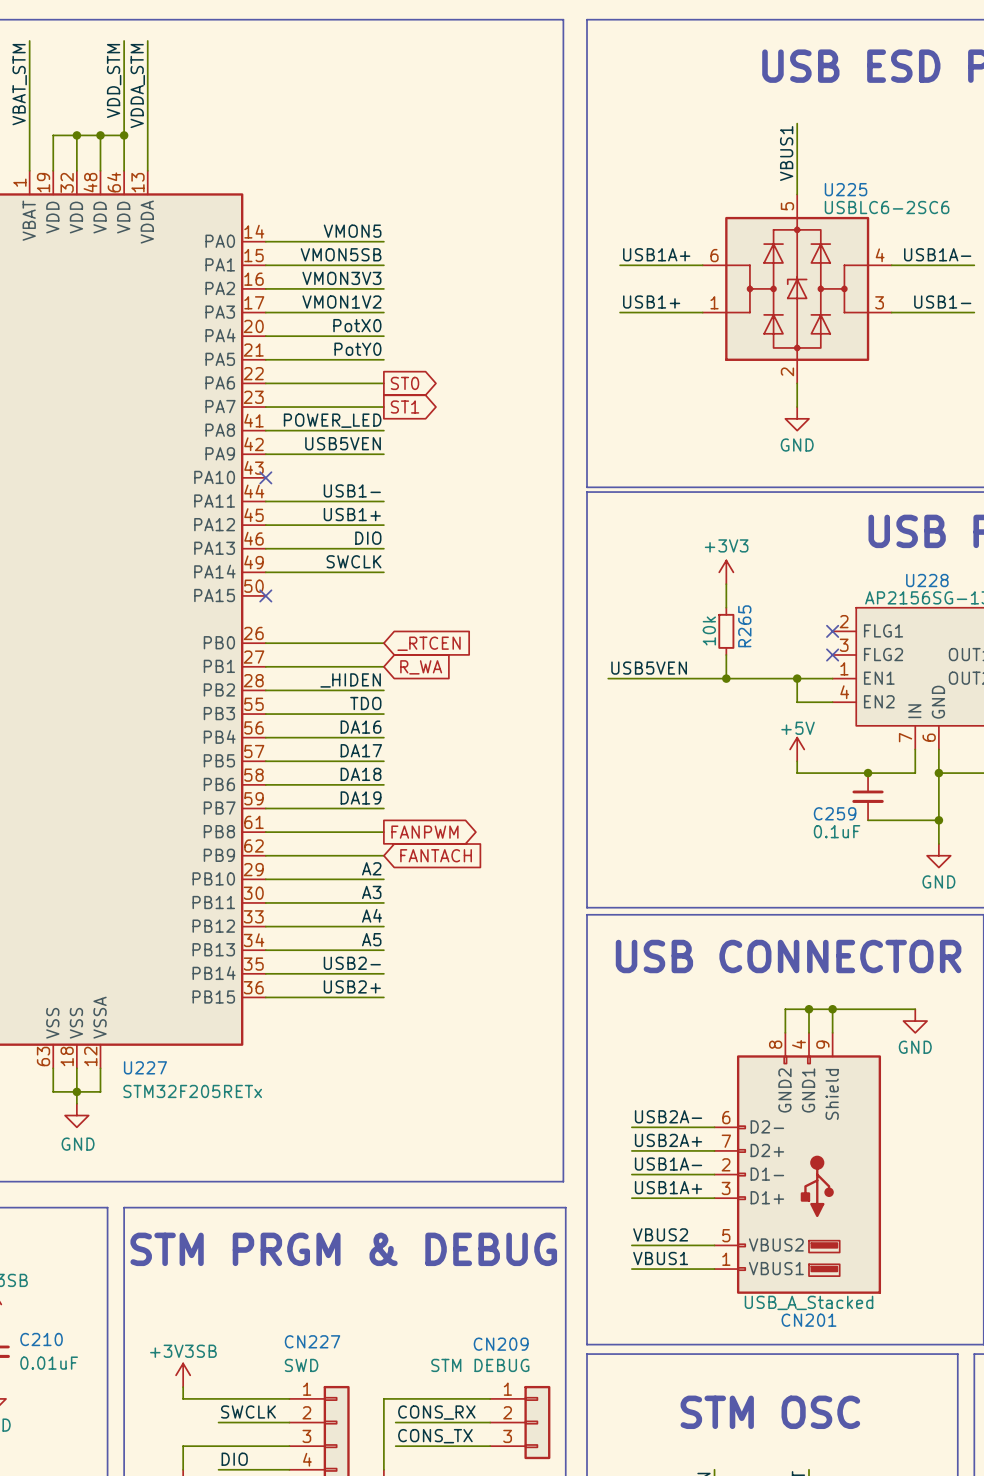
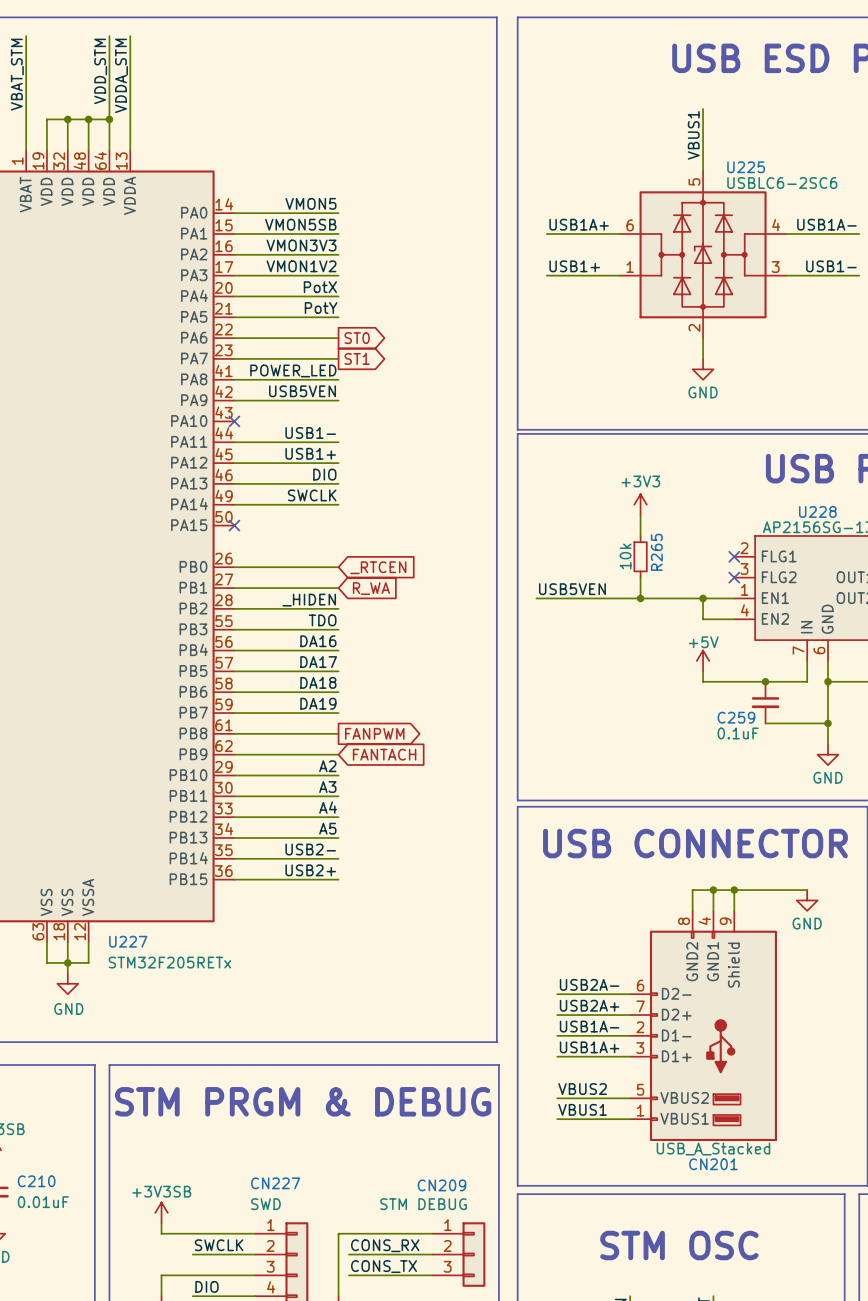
label: PotX0 (357, 325) -> PotX (320, 287)
label: PotY0 (357, 349) -> PotY (321, 308)

